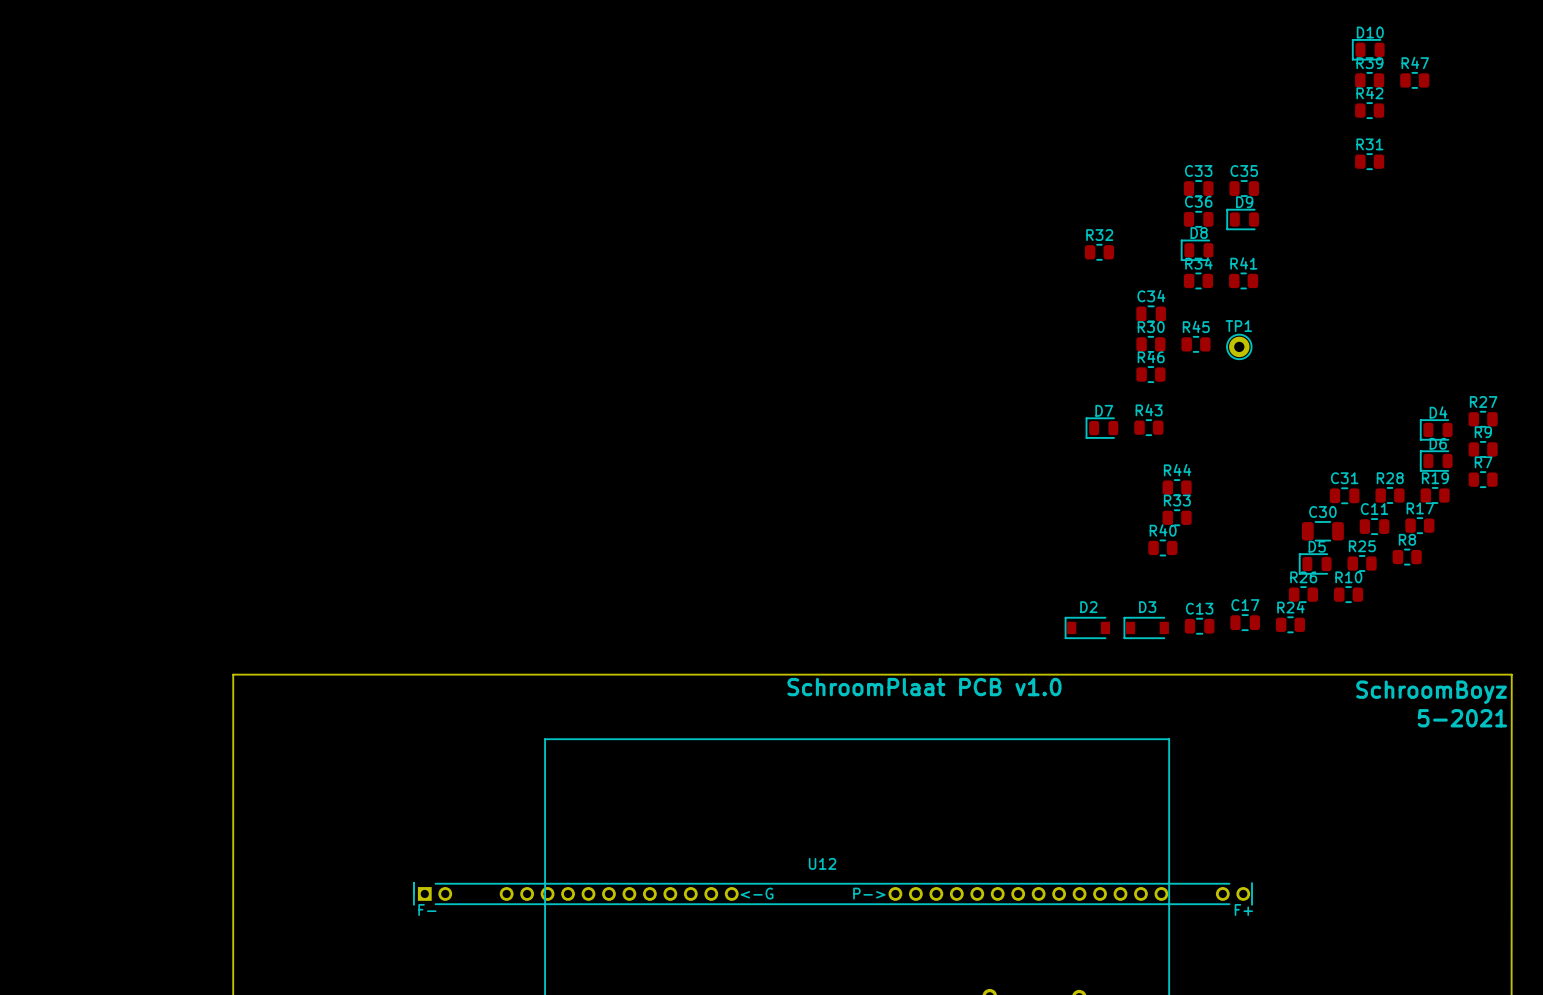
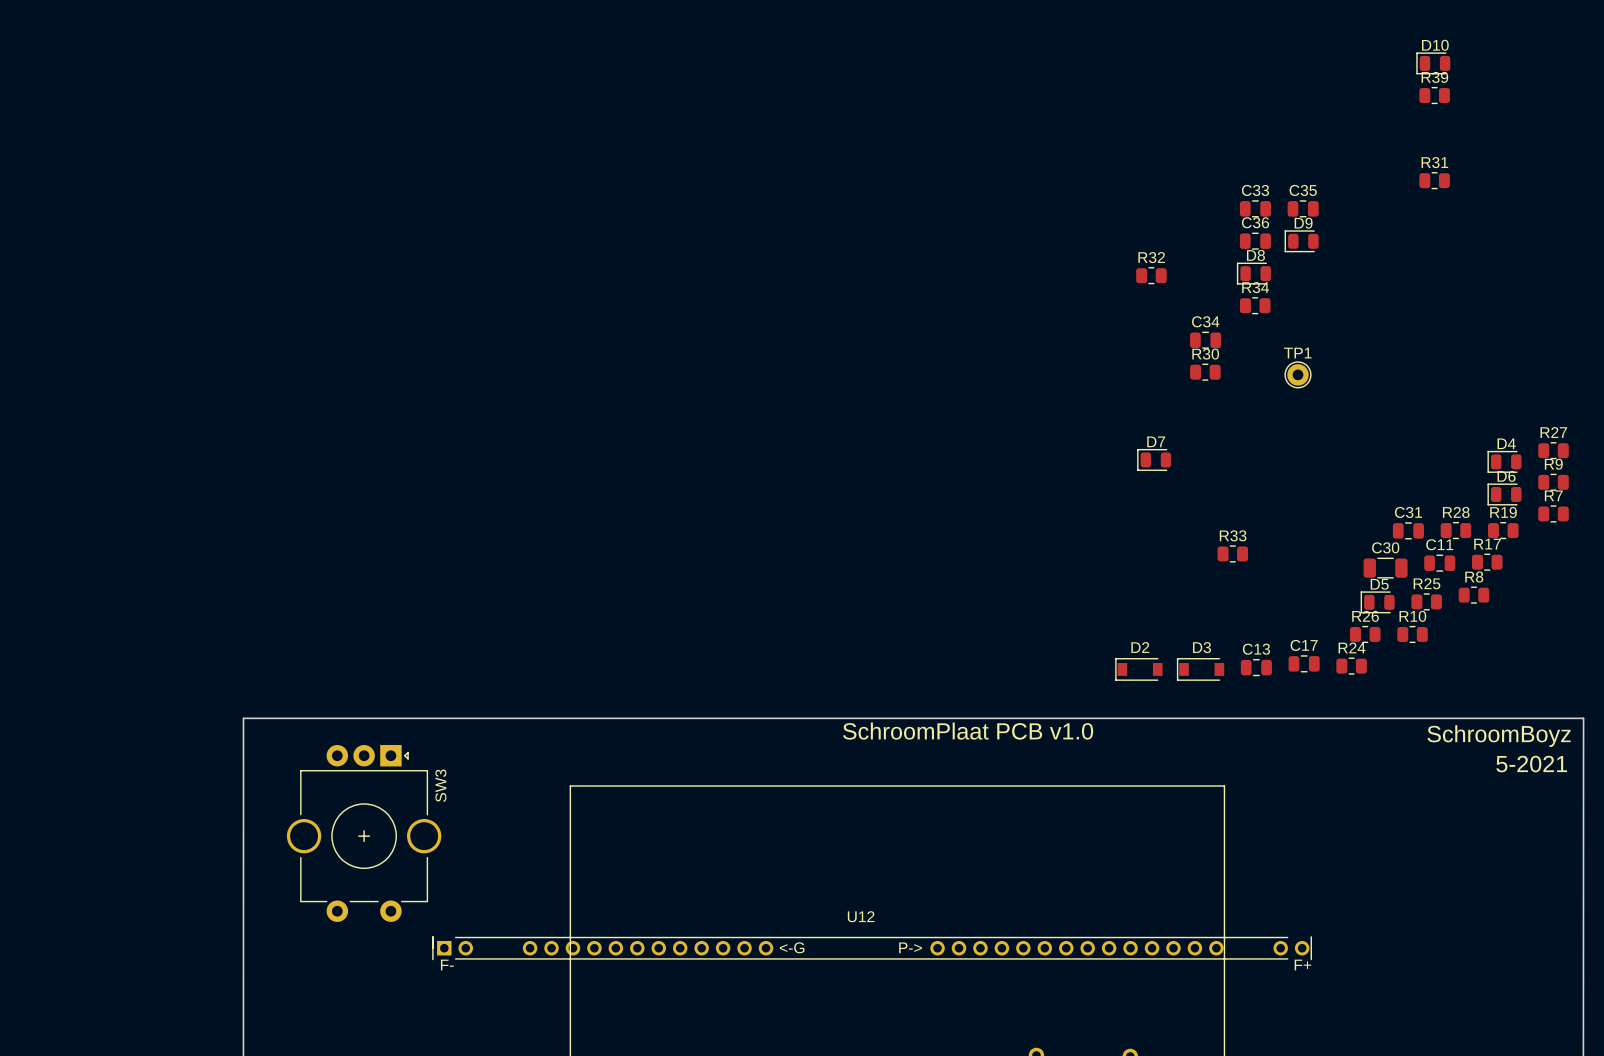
R47: (1414, 80) -> none
R42: (1369, 110) -> none
R41: (1243, 280) -> none
R45: (1196, 344) -> none
R46: (1150, 374) -> none
R43: (1148, 427) -> none
R44: (1177, 487) -> none
R40: (1162, 547) -> none
SW3: none -> (364, 833)

